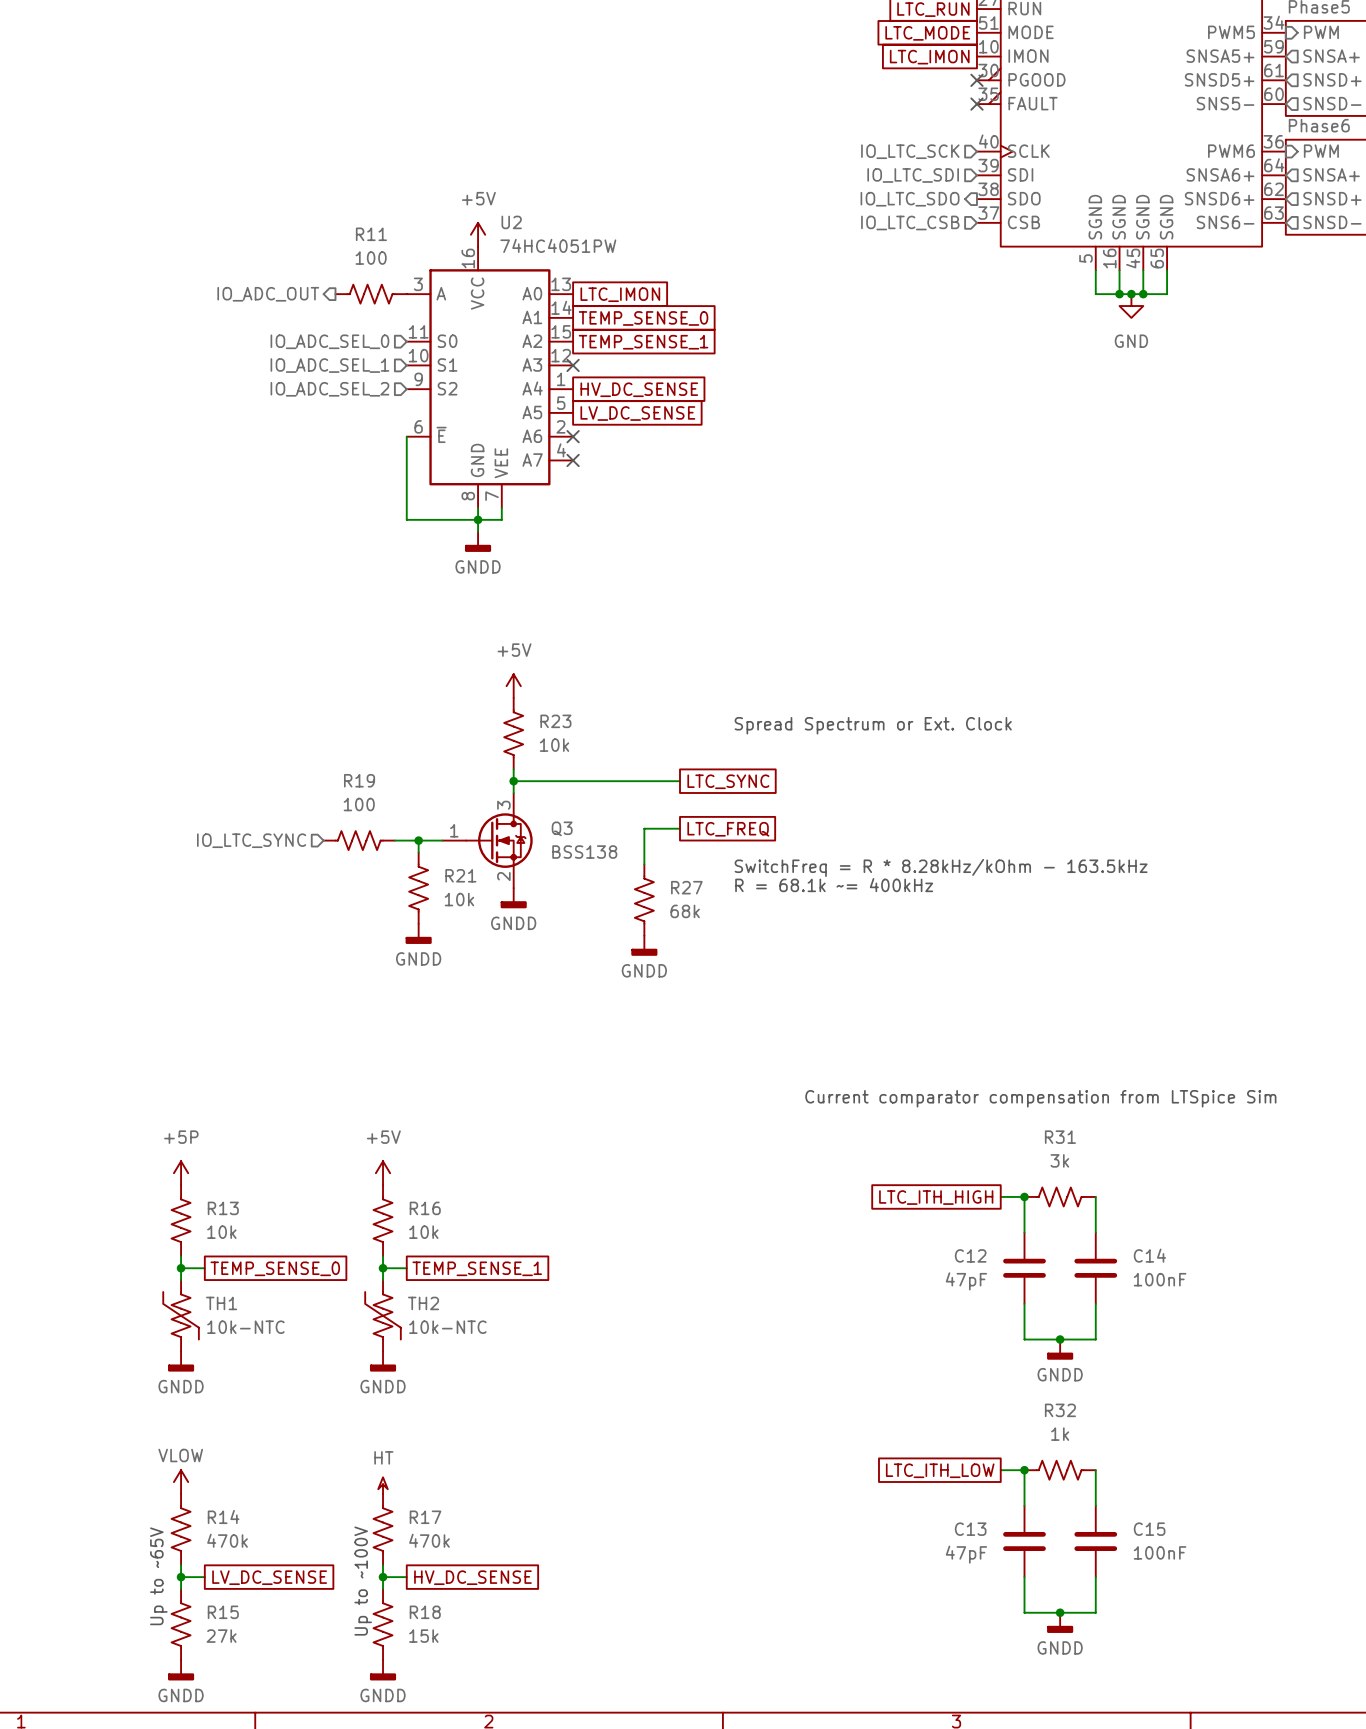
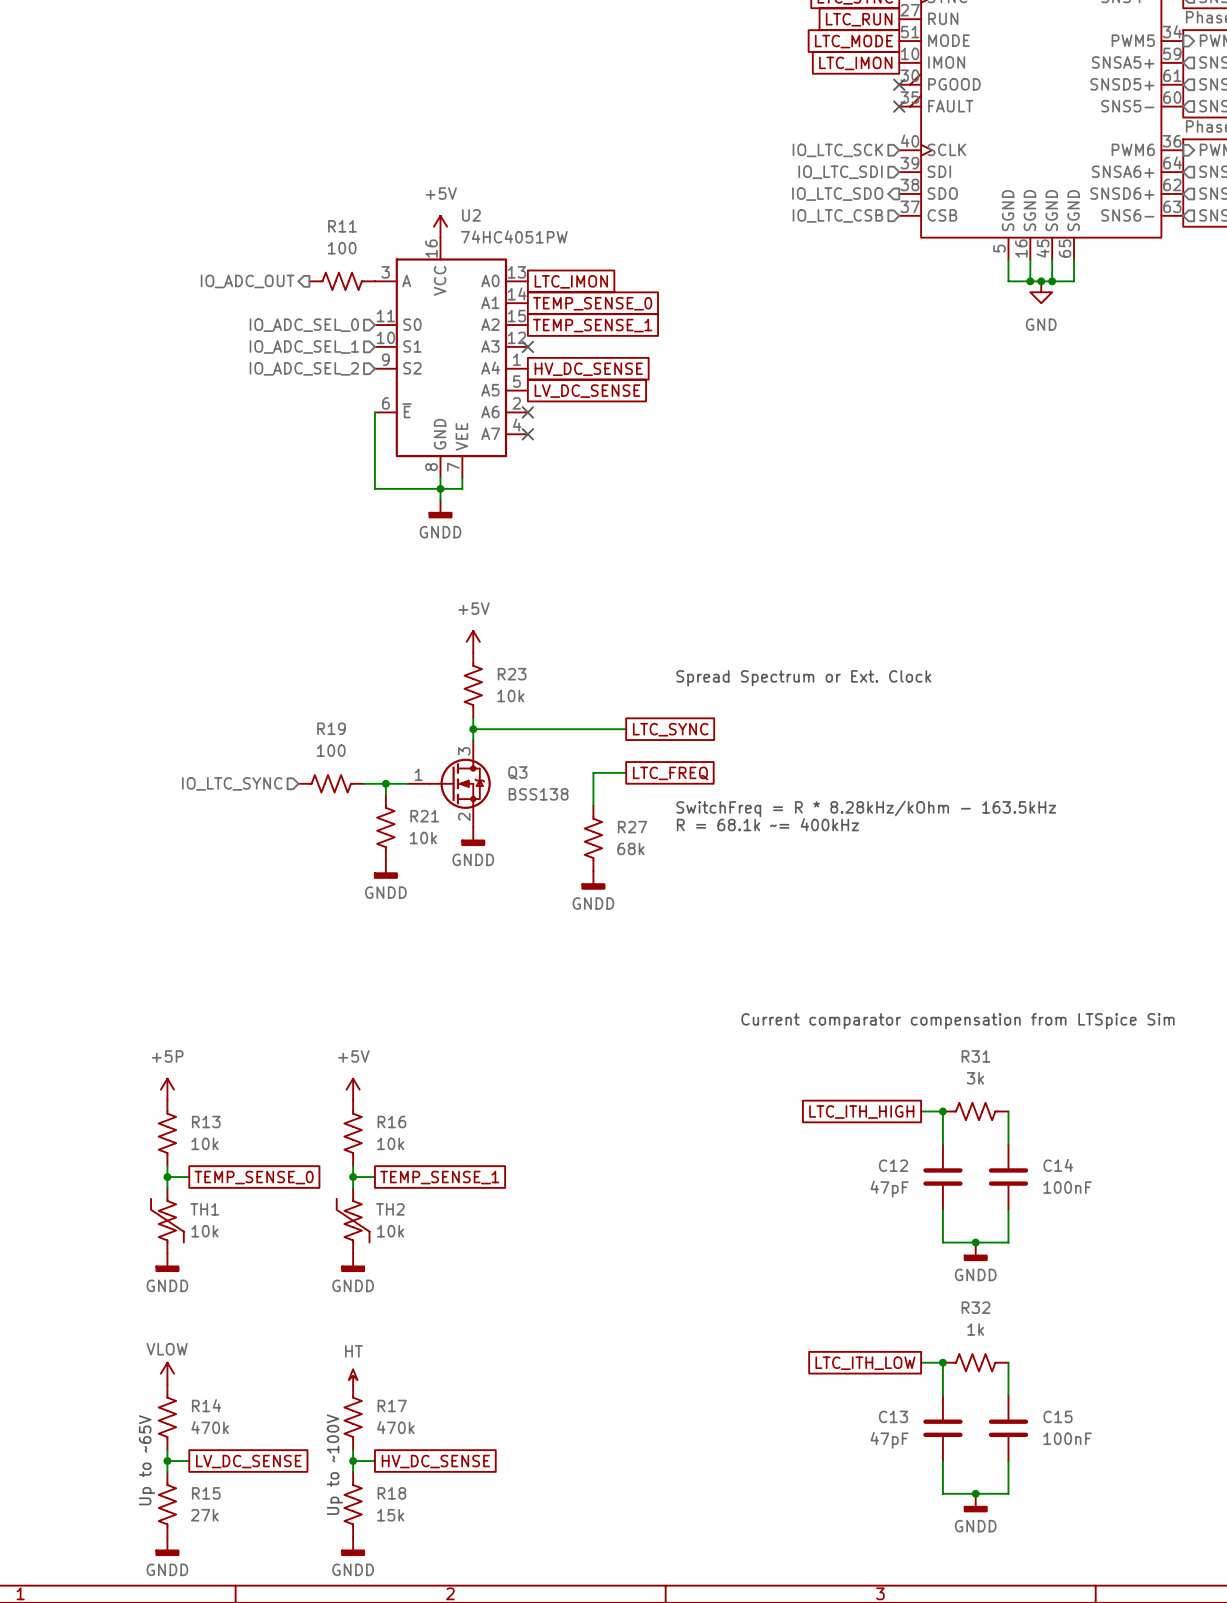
TH1 value: 10k-NTC (245, 1327) -> 10k (204, 1231)
TH2 value: 10k-NTC (447, 1327) -> 10k (390, 1231)

